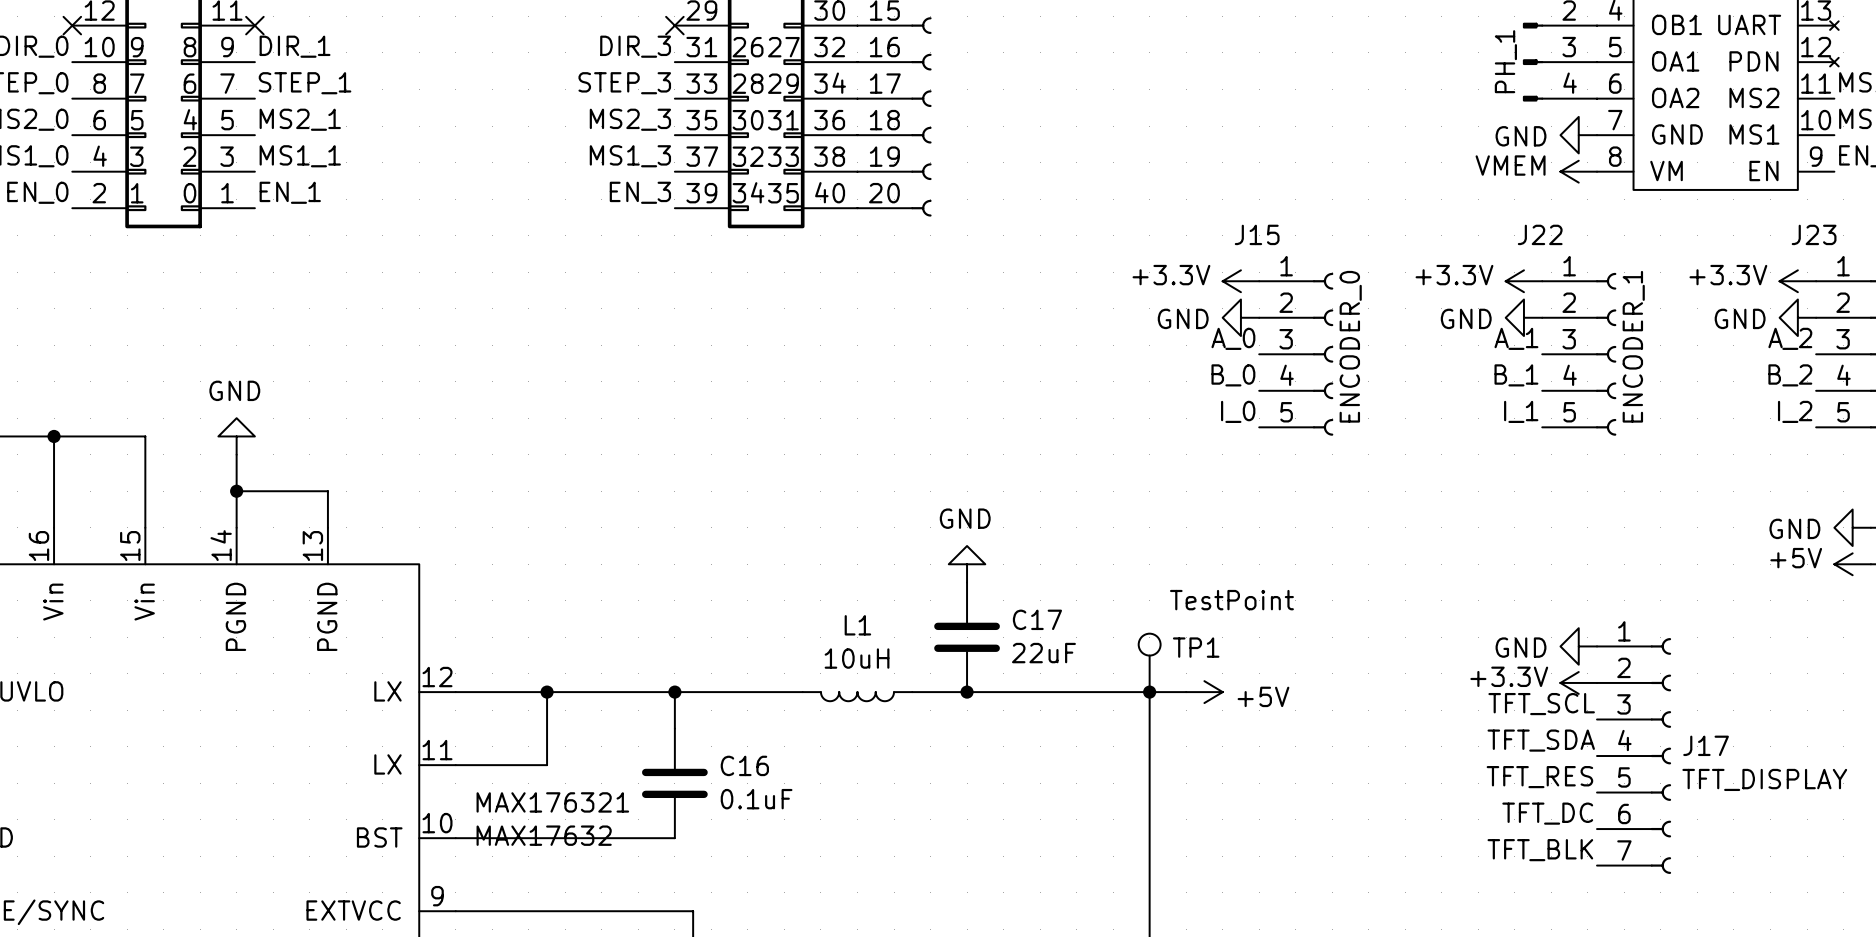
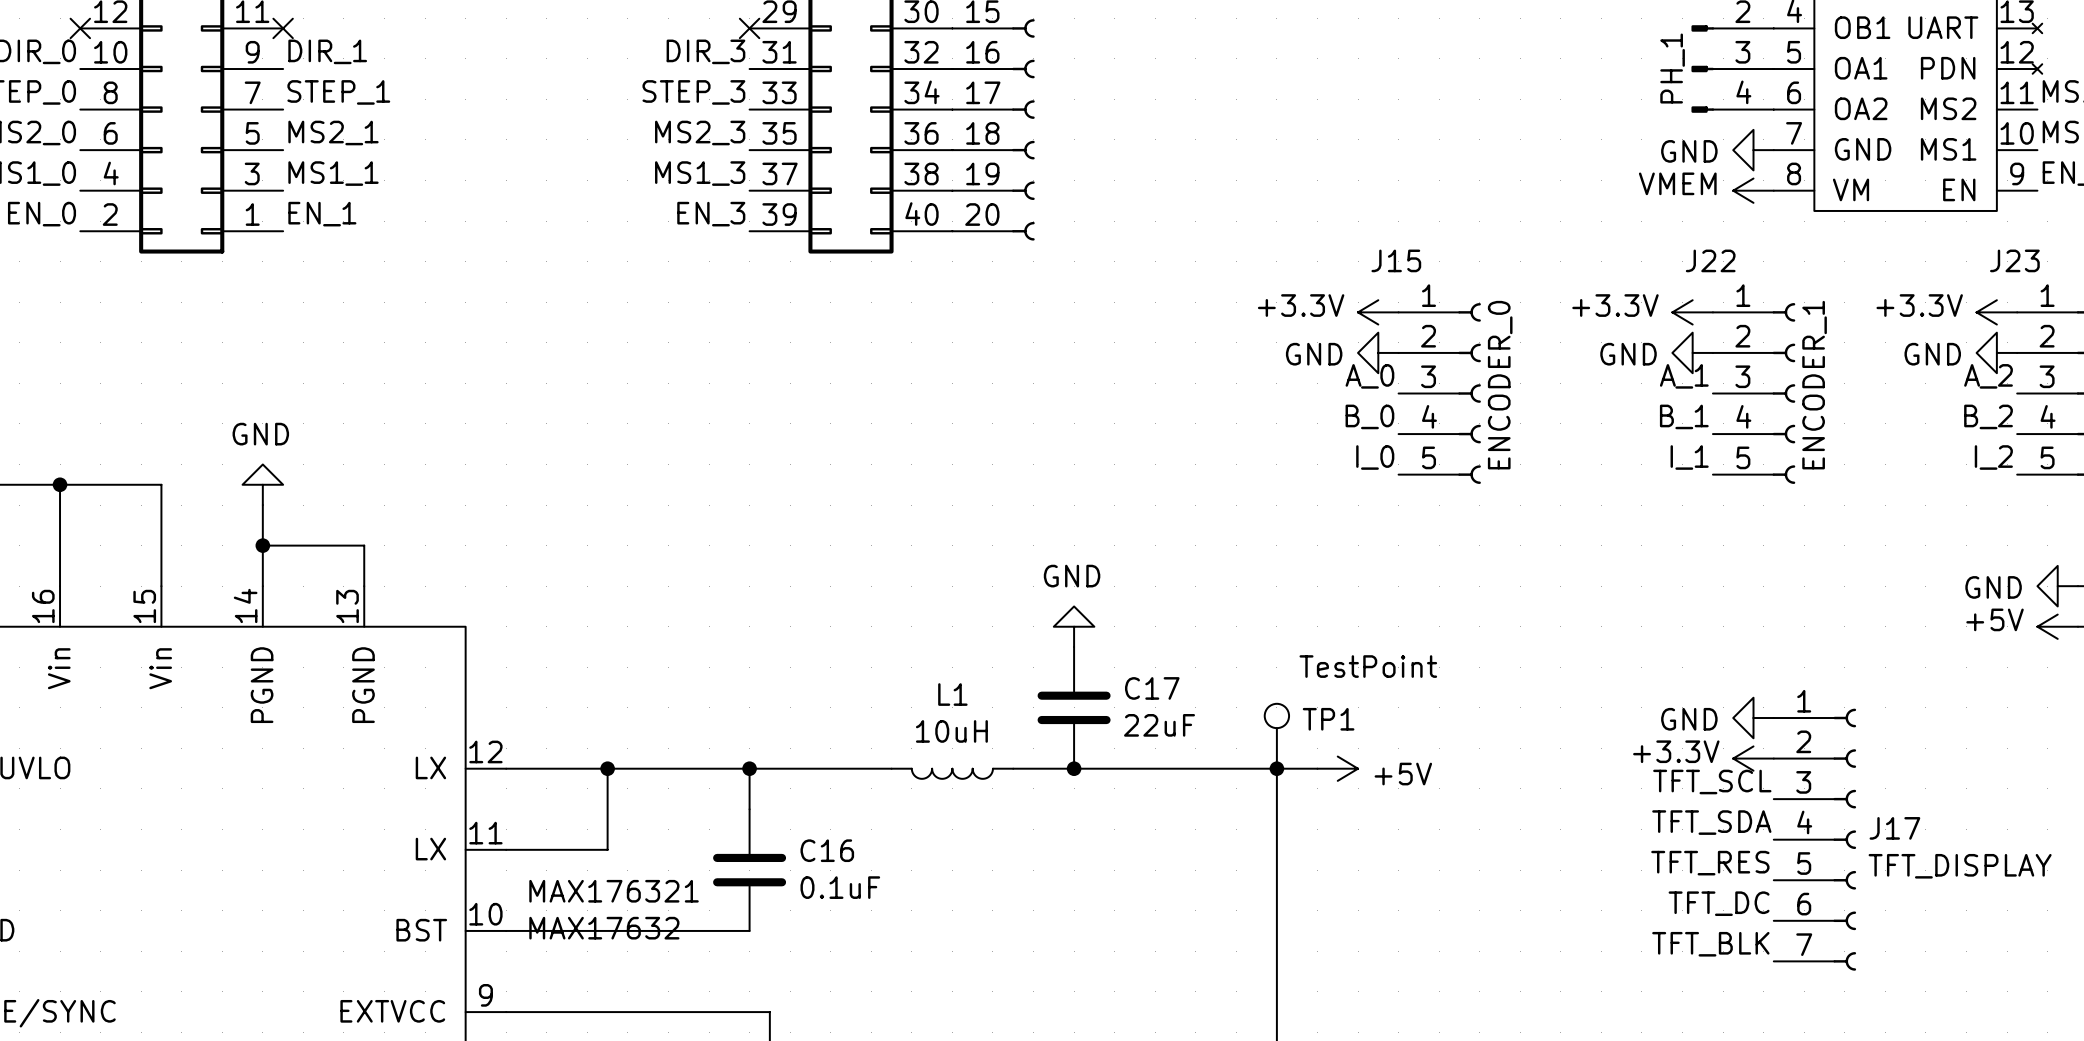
text: 9 (137, 47) -> none
text: 8 (189, 47) -> none
text: 26 (748, 47) -> none
text: 27 (783, 47) -> none
text: 7 (137, 83) -> none
text: 6 (189, 83) -> none
text: 28 (748, 83) -> none
text: 29 (783, 83) -> none
text: 4 (190, 119) -> none
text: 5 (137, 120) -> none
text: 30 (748, 120) -> none
text: 31 (783, 120) -> none
text: 3 (136, 156) -> none
text: 2 (189, 156) -> none
text: 32 (748, 156) -> none
text: 33 (783, 156) -> none
text: 34 (748, 192) -> none
text: 1 (137, 193) -> none
text: 0 (189, 193) -> none
text: 35 (783, 193) -> none

